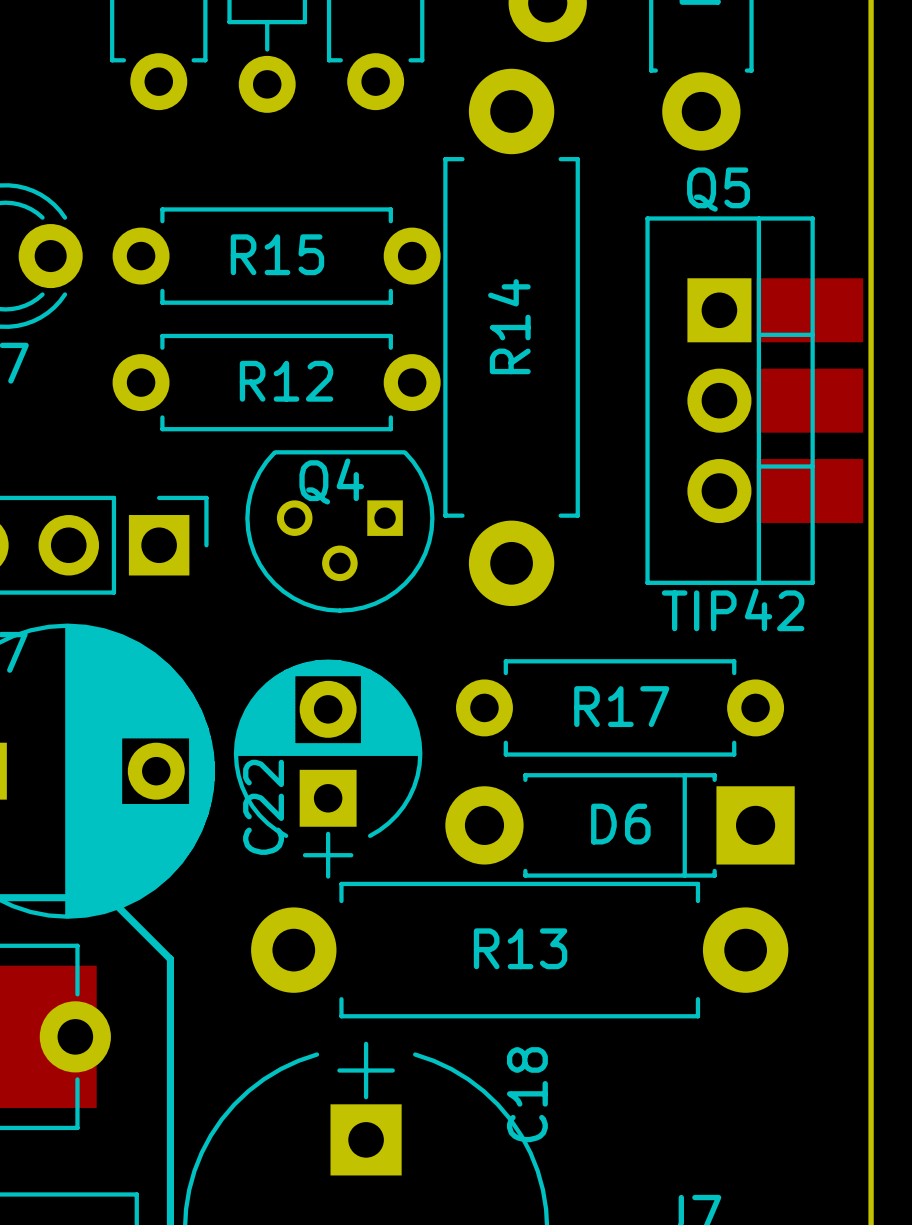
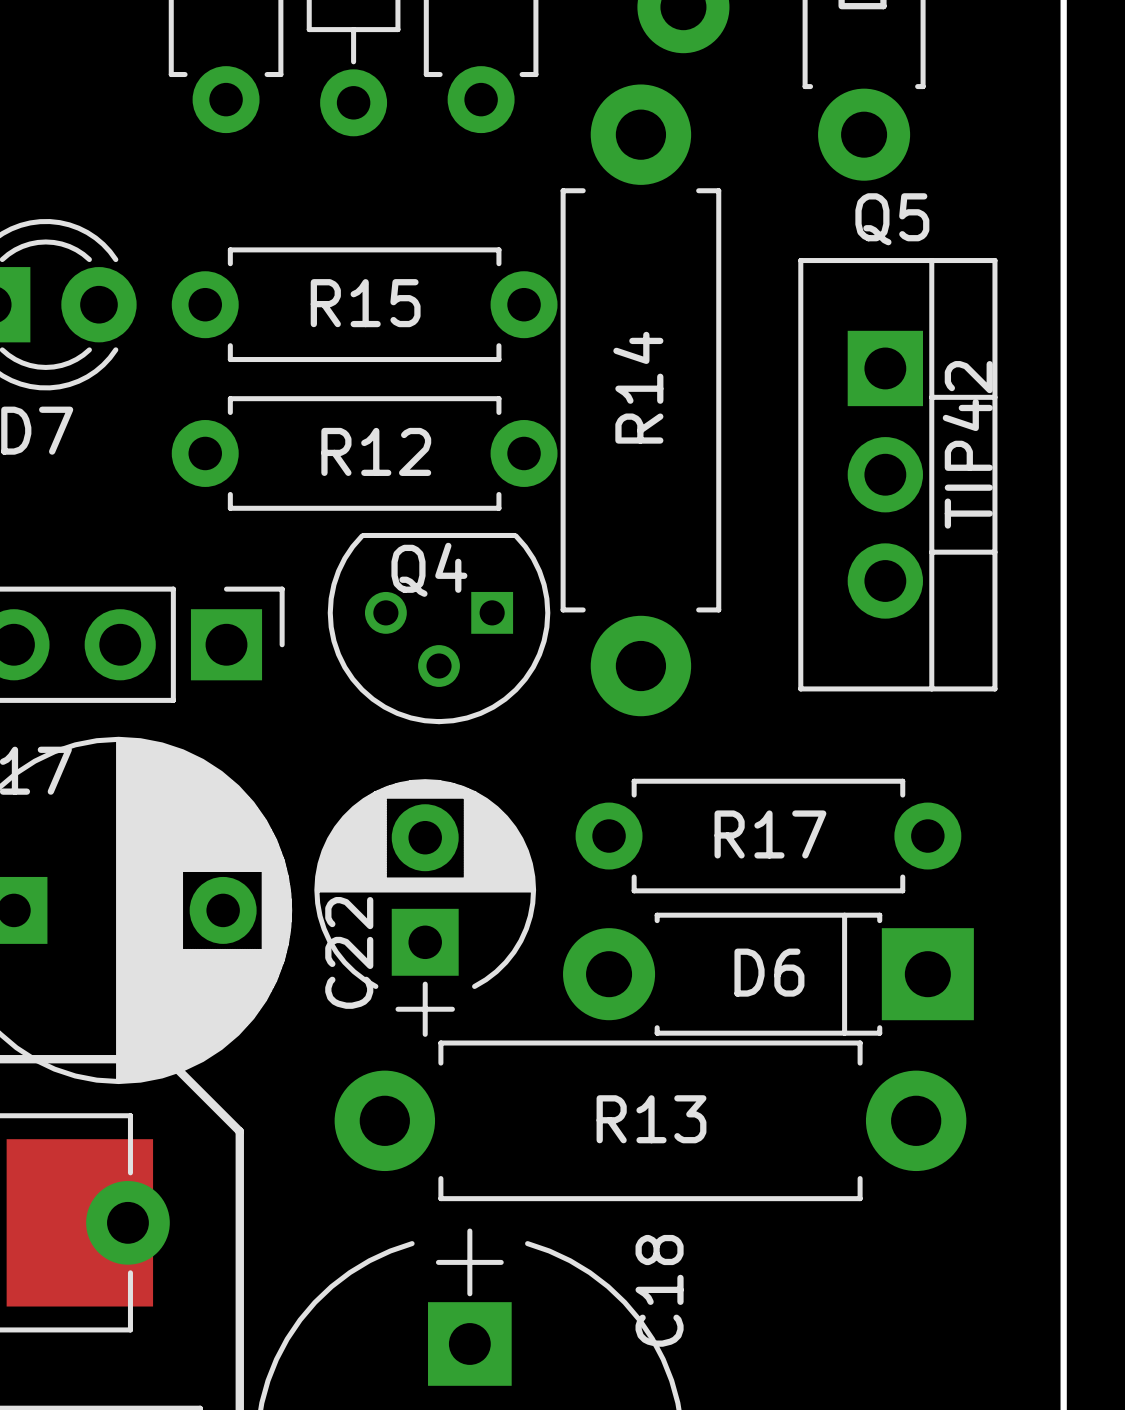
Q5 footprint: [645, 216, 864, 585] -> [798, 258, 998, 692]
text rotation: 0° (733, 609) -> 90° counterclockwise (967, 444)
text position: TIP42 (733, 609) -> TIP42 (967, 444)

